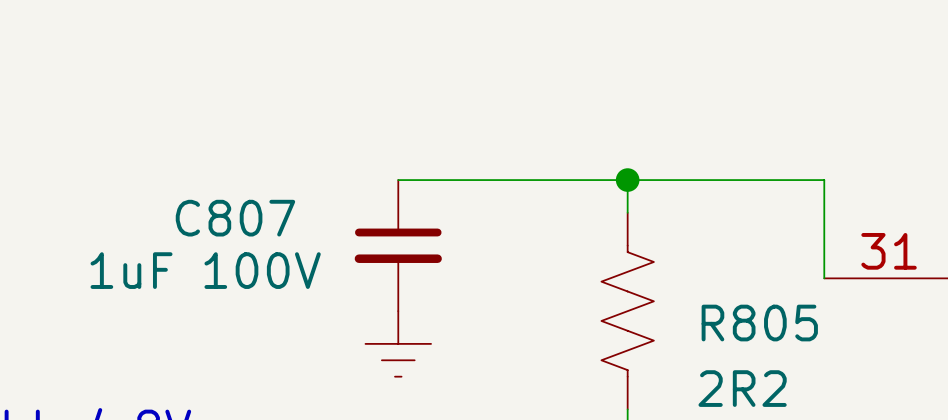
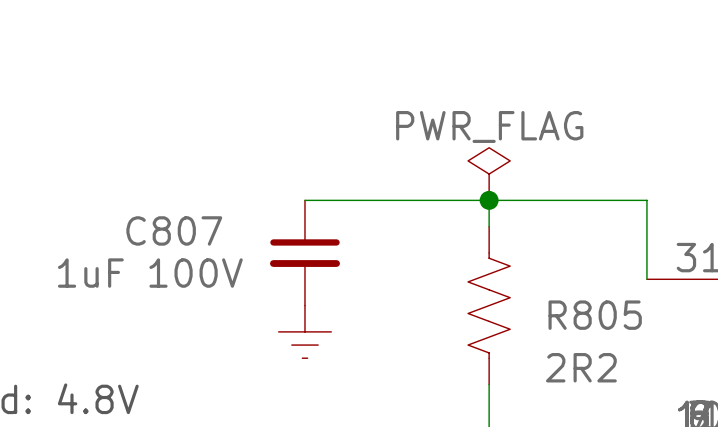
power symbol: none -> PWR_FLAG (489, 174)

